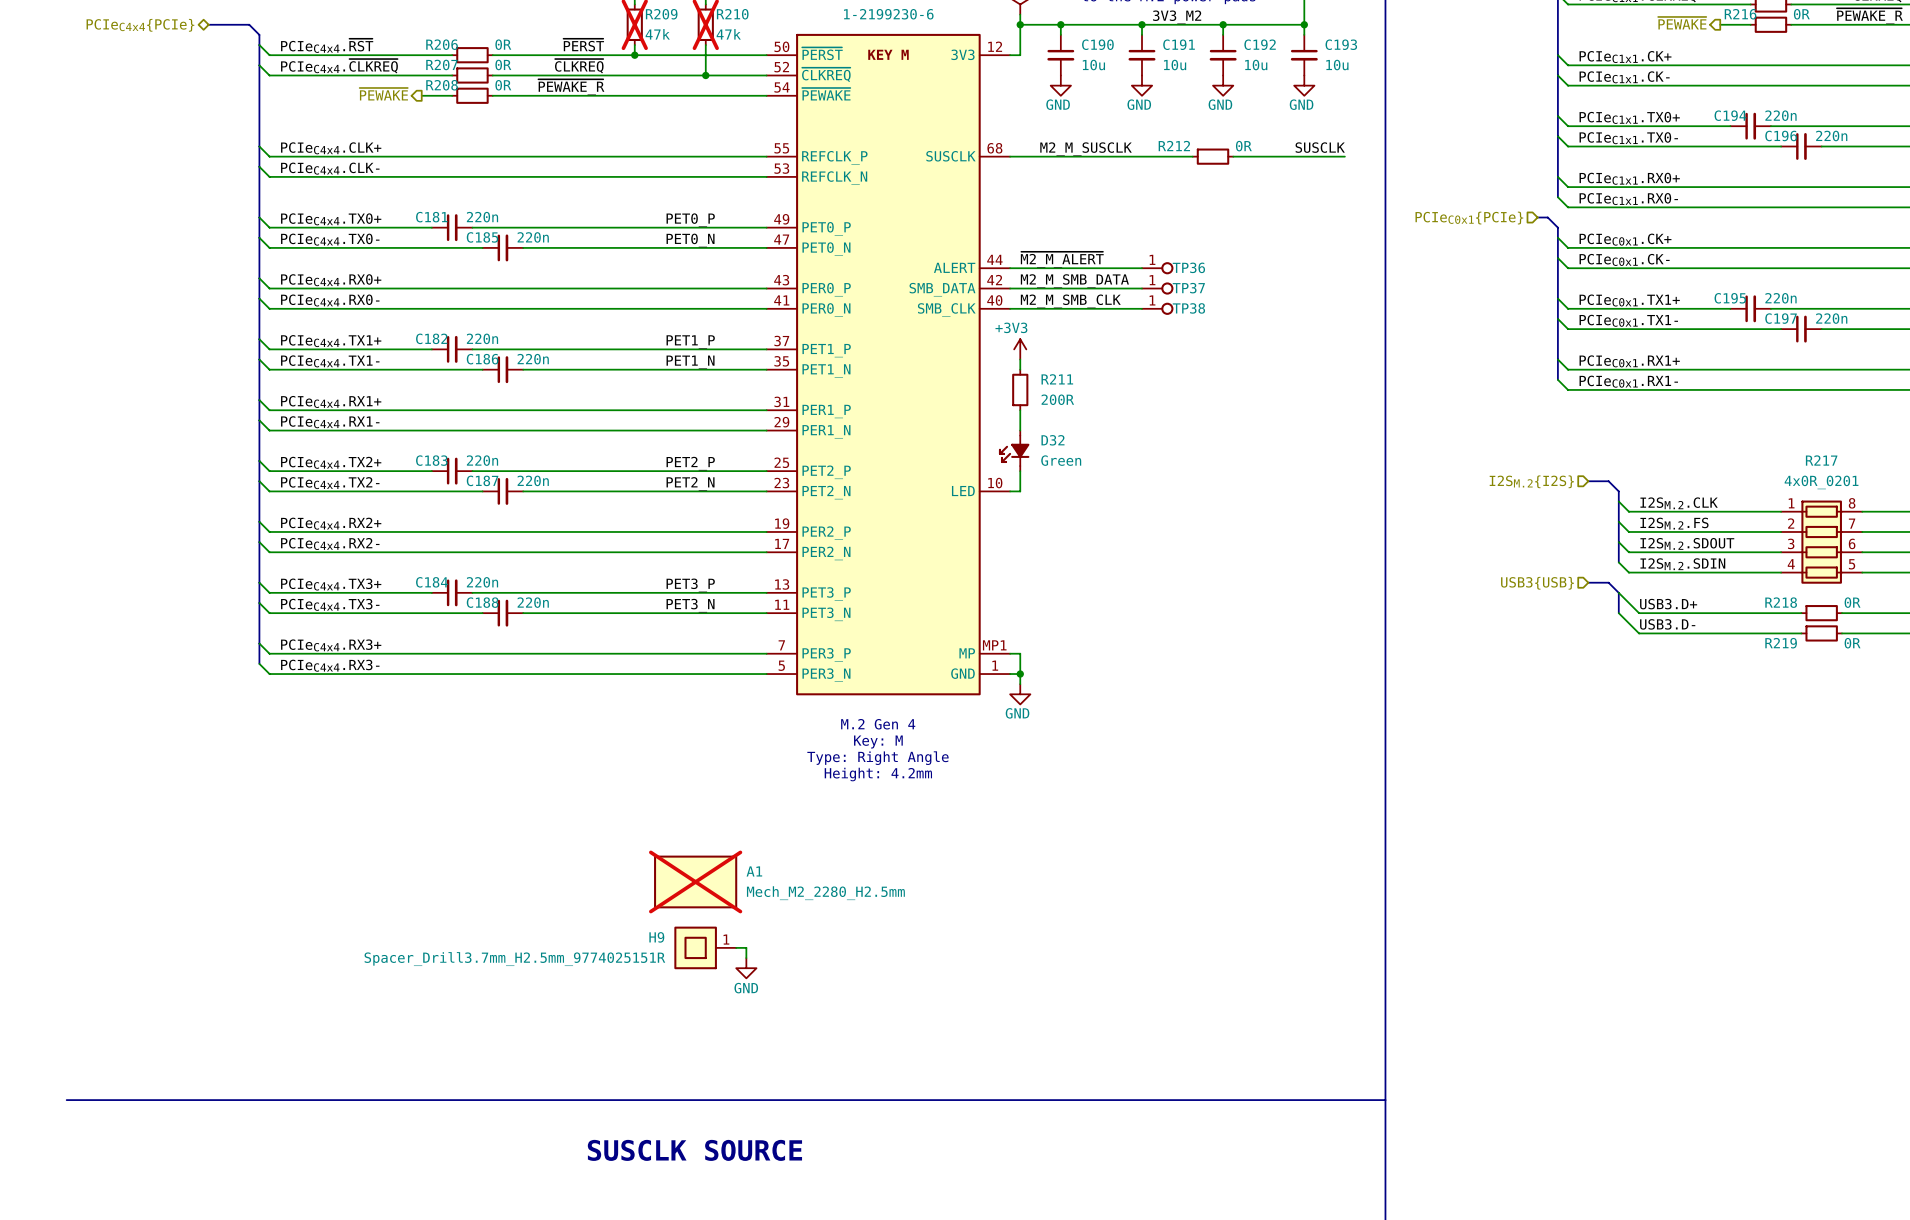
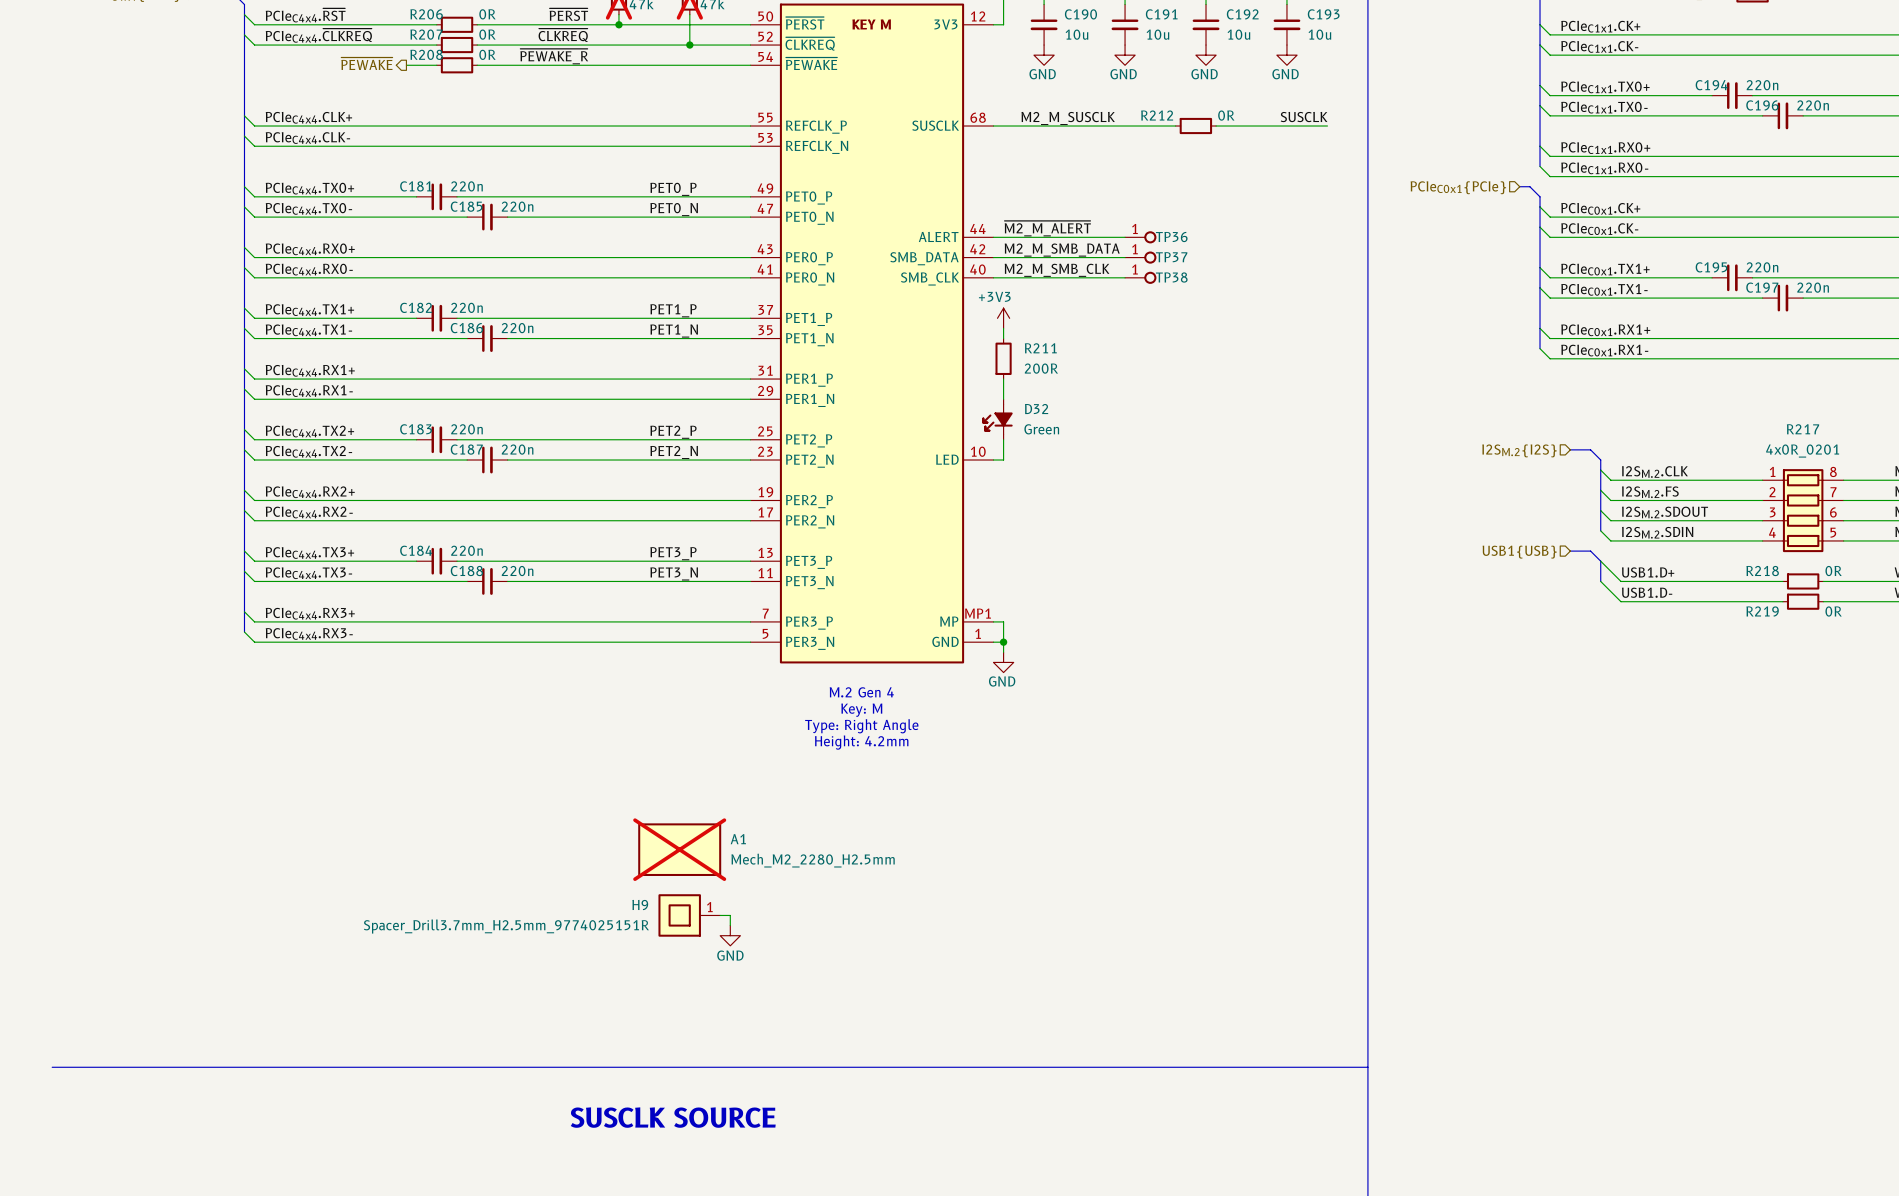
hierarchical label: USB3{USB} (1537, 583) -> USB1{USB} (1519, 552)
label: USB3.D+ (1668, 604) -> USB1.D+ (1648, 572)
label: USB3.D- (1667, 624) -> USB1.D- (1647, 592)

